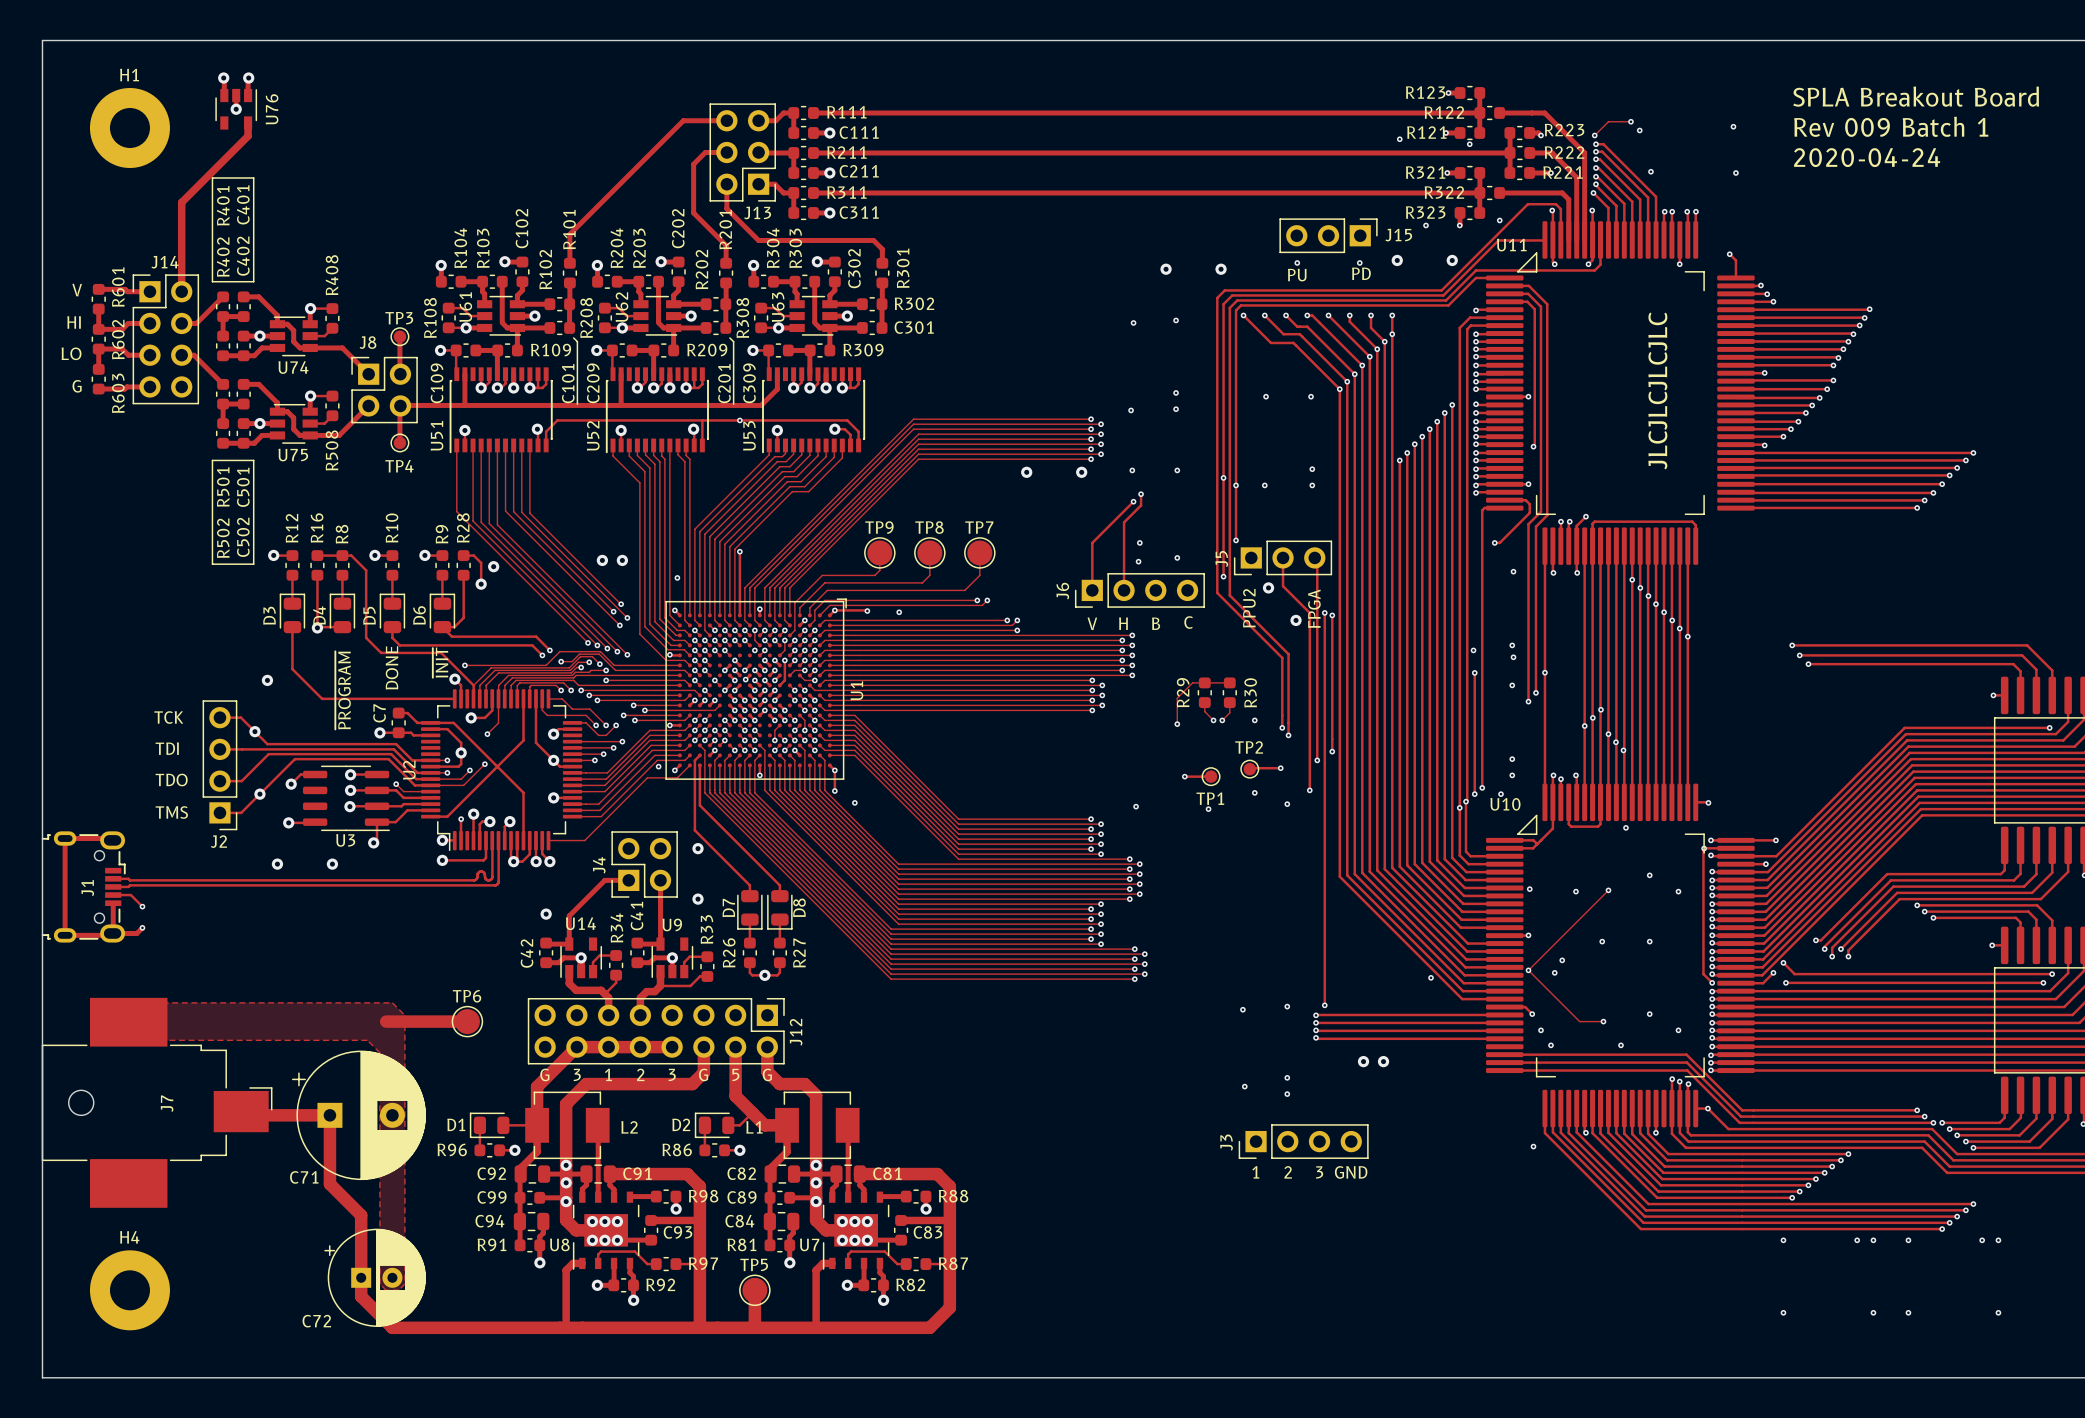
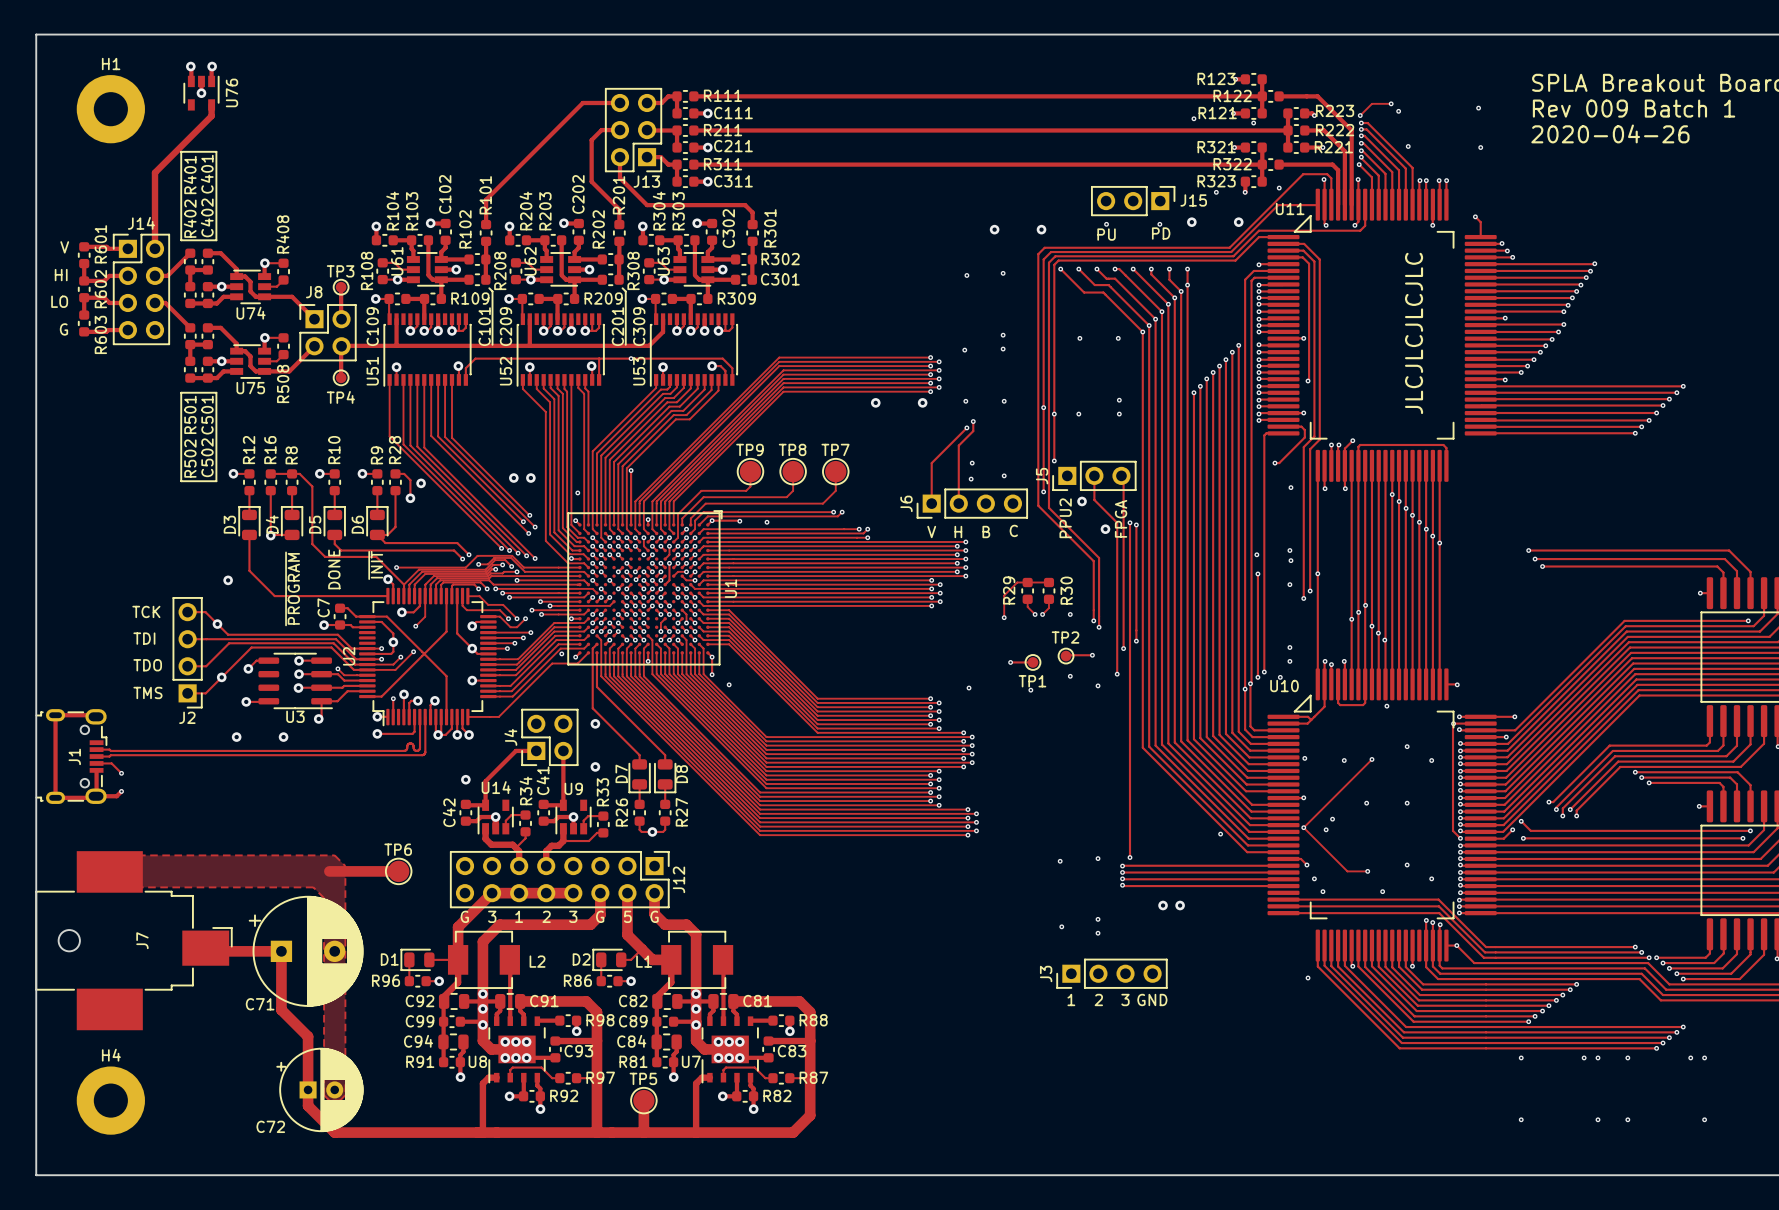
text: 2020-04-24 (1867, 157) -> 2020-04-26 (1610, 133)

